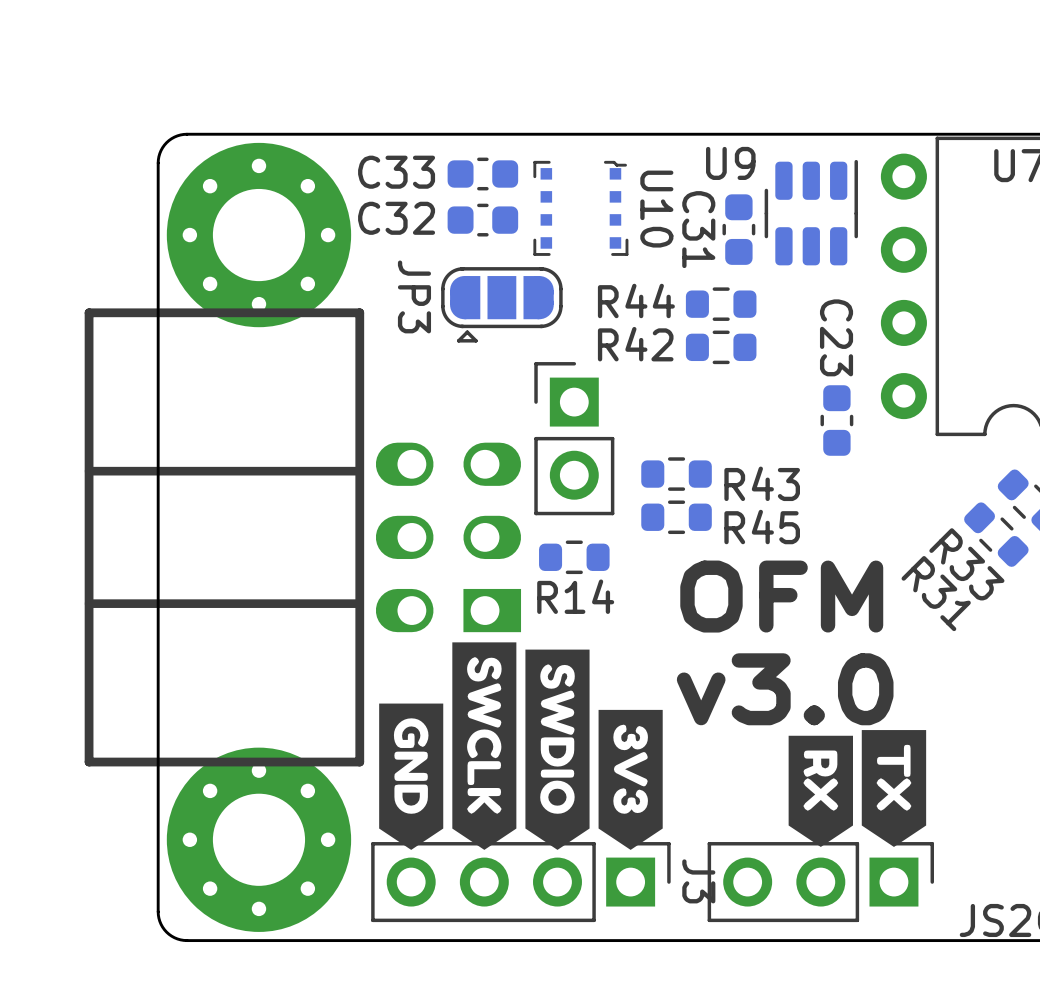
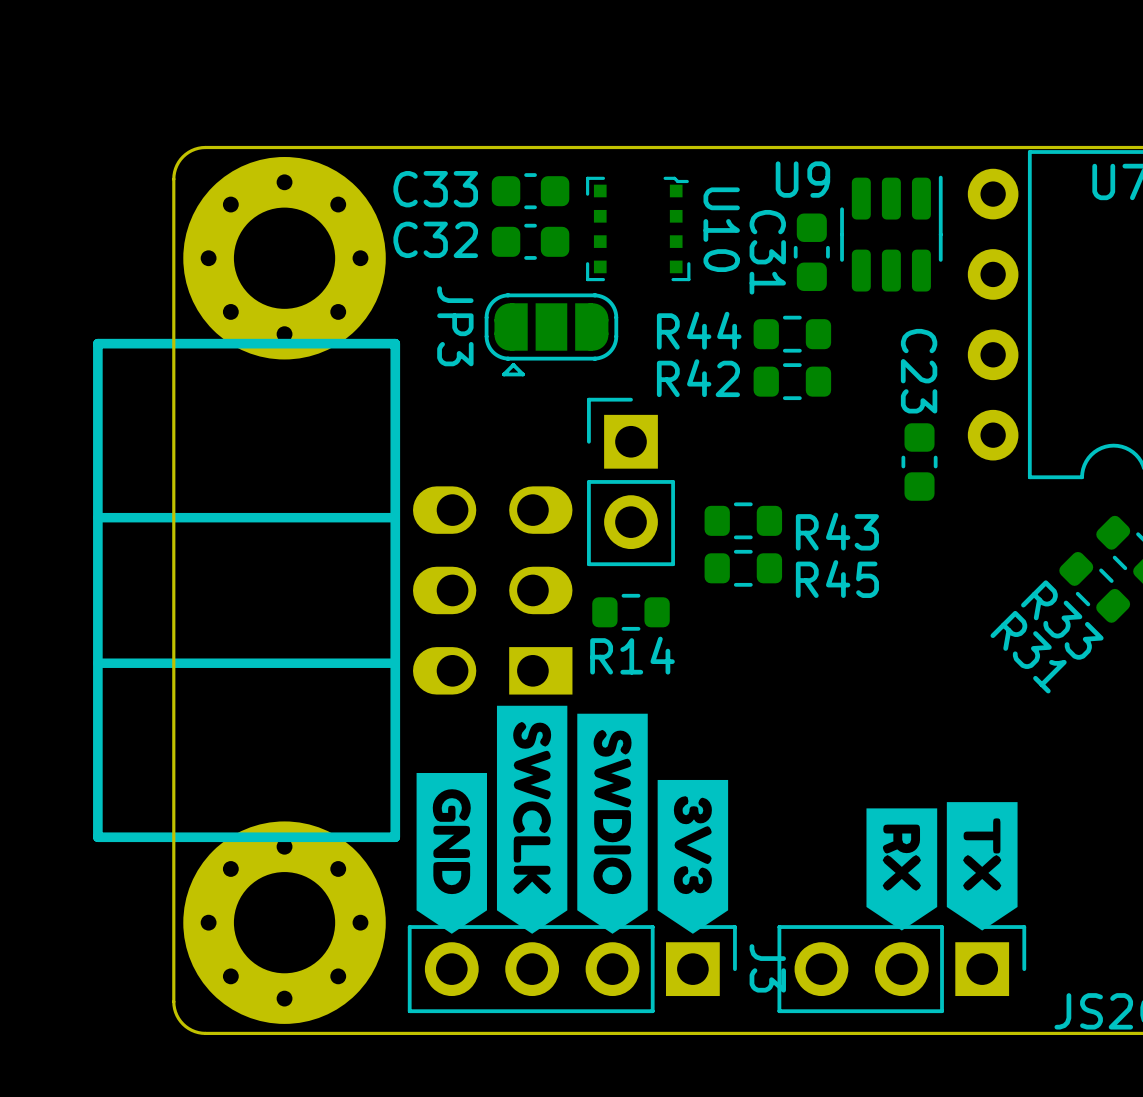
text: OFM (781, 596) -> none
text: v3.0 (785, 689) -> none

